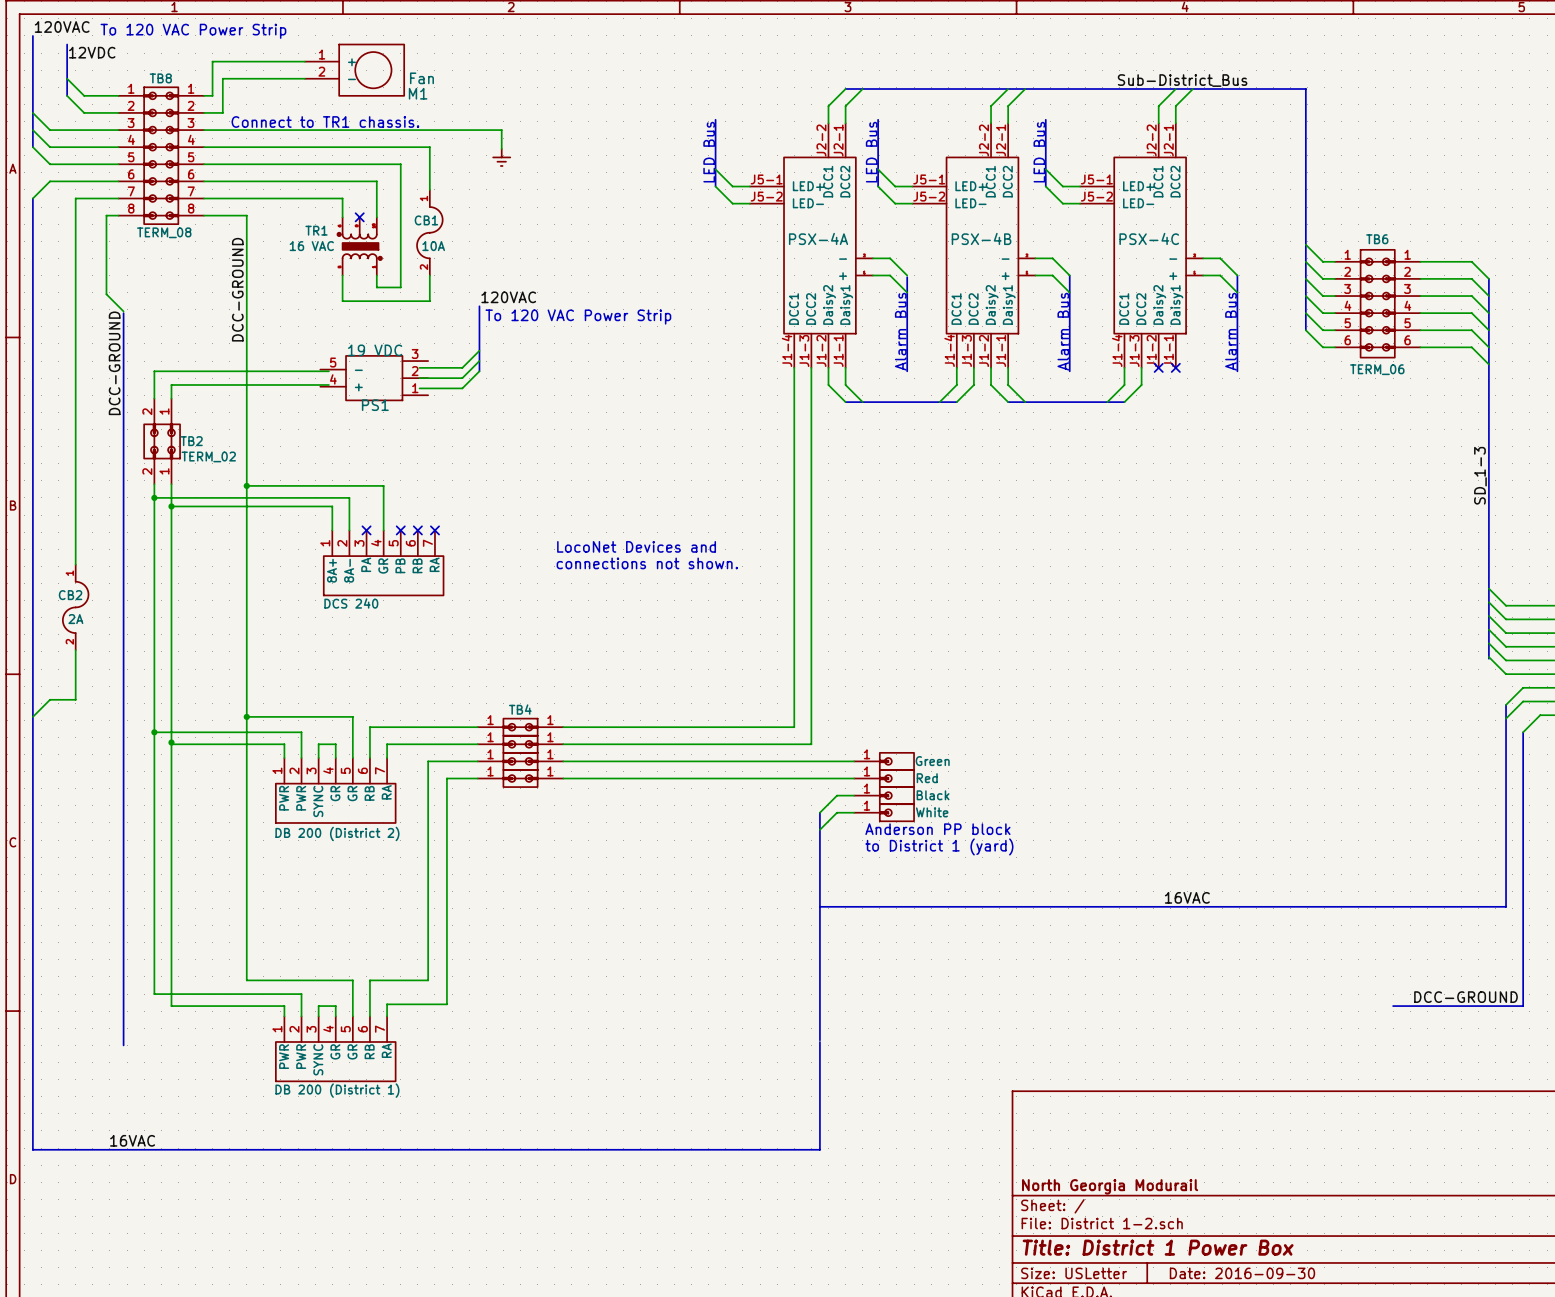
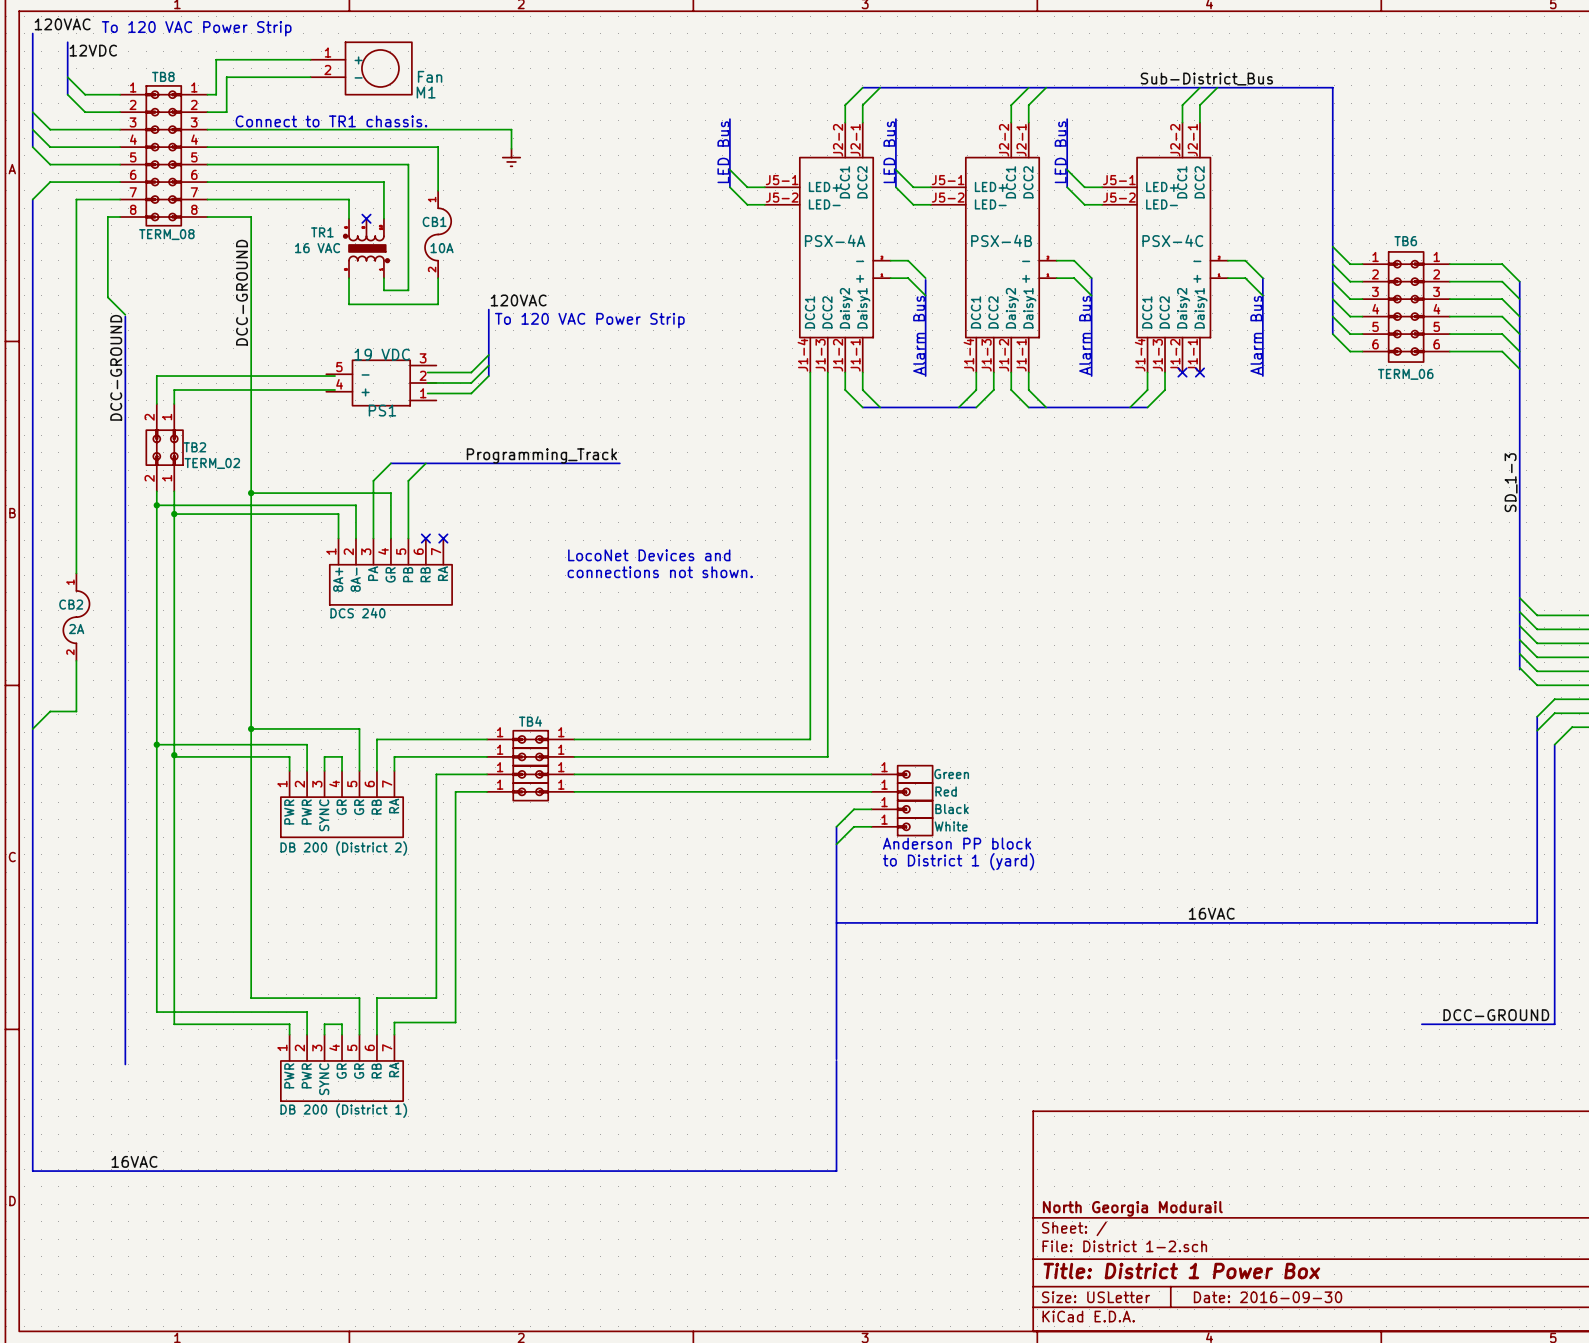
label: none -> Programming_Track (541, 455)
wire: none -> (390, 463) (373, 480) (373, 538)
bus: none -> (390, 463) (619, 463)
wire: none -> (425, 463) (408, 480) (408, 538)
no-connect mark: (366, 530) -> none
no-connect mark: (400, 530) -> none

